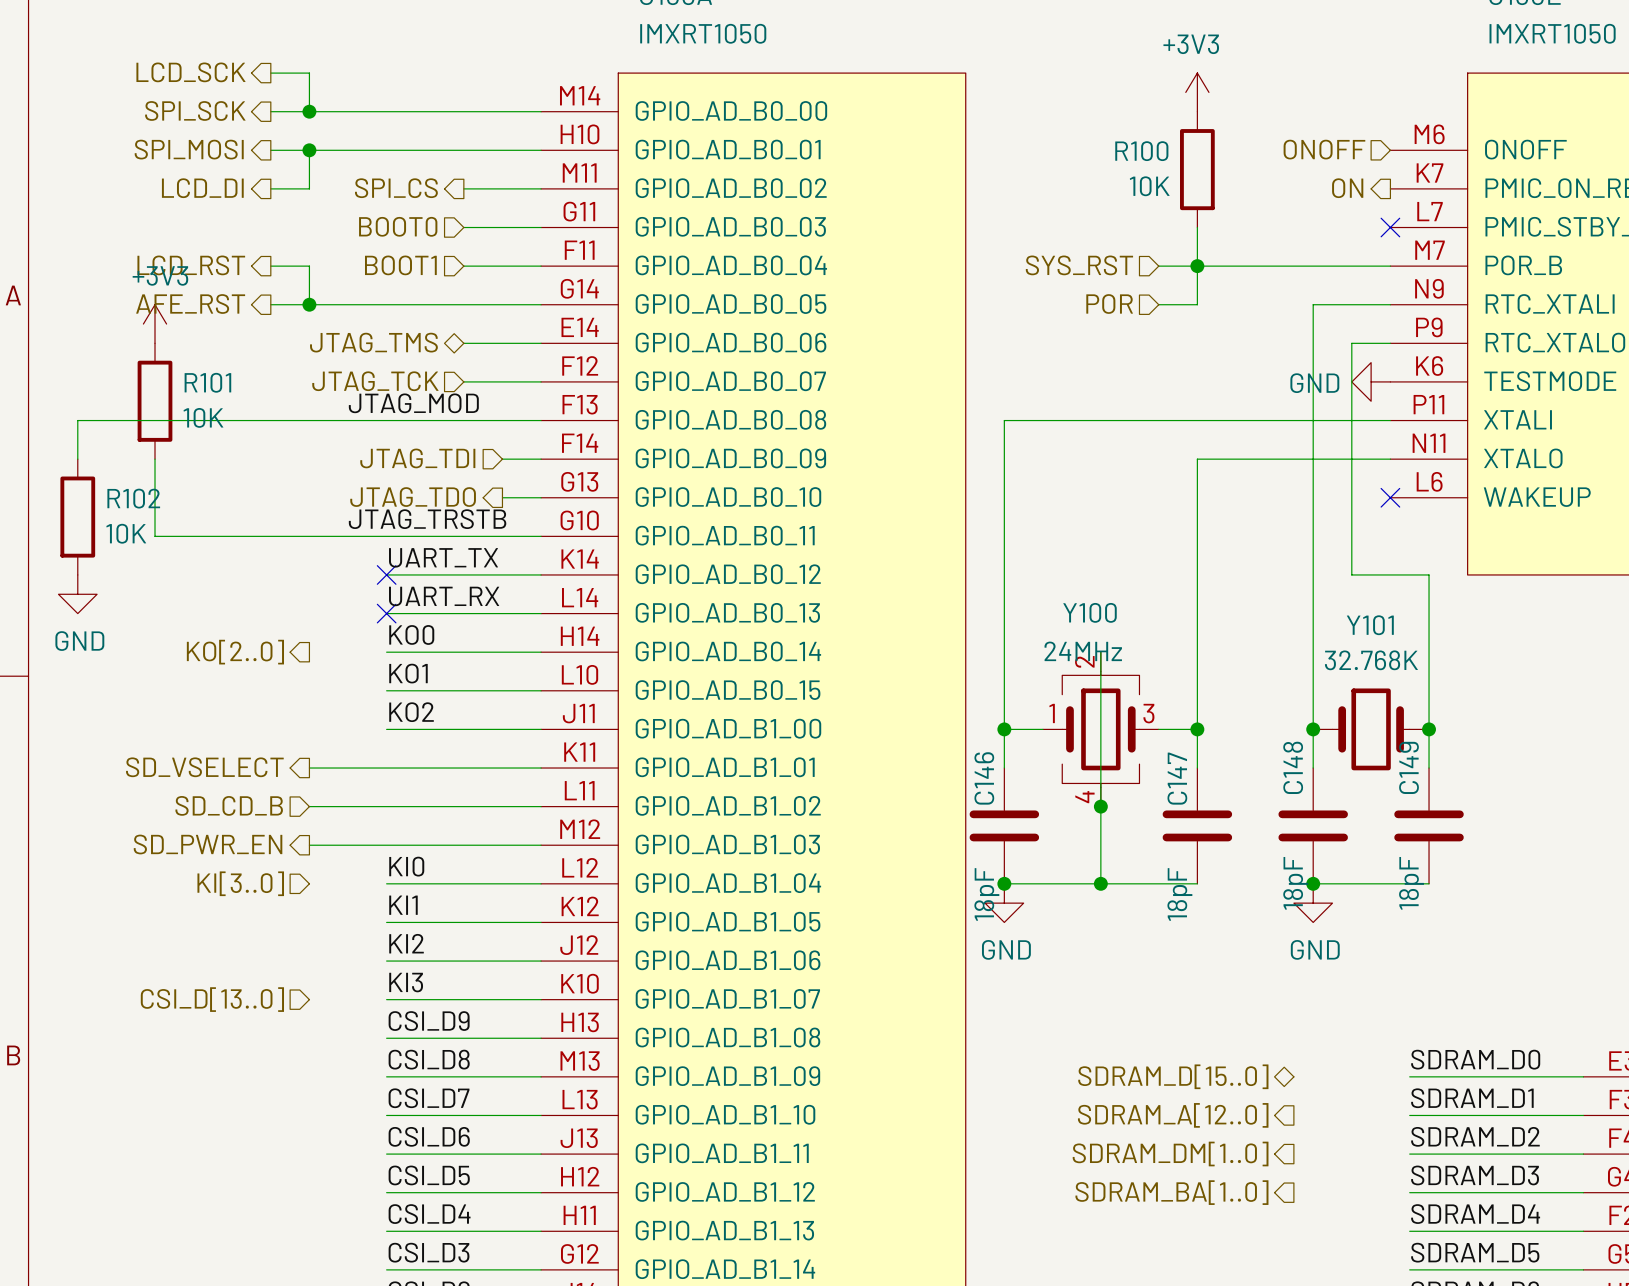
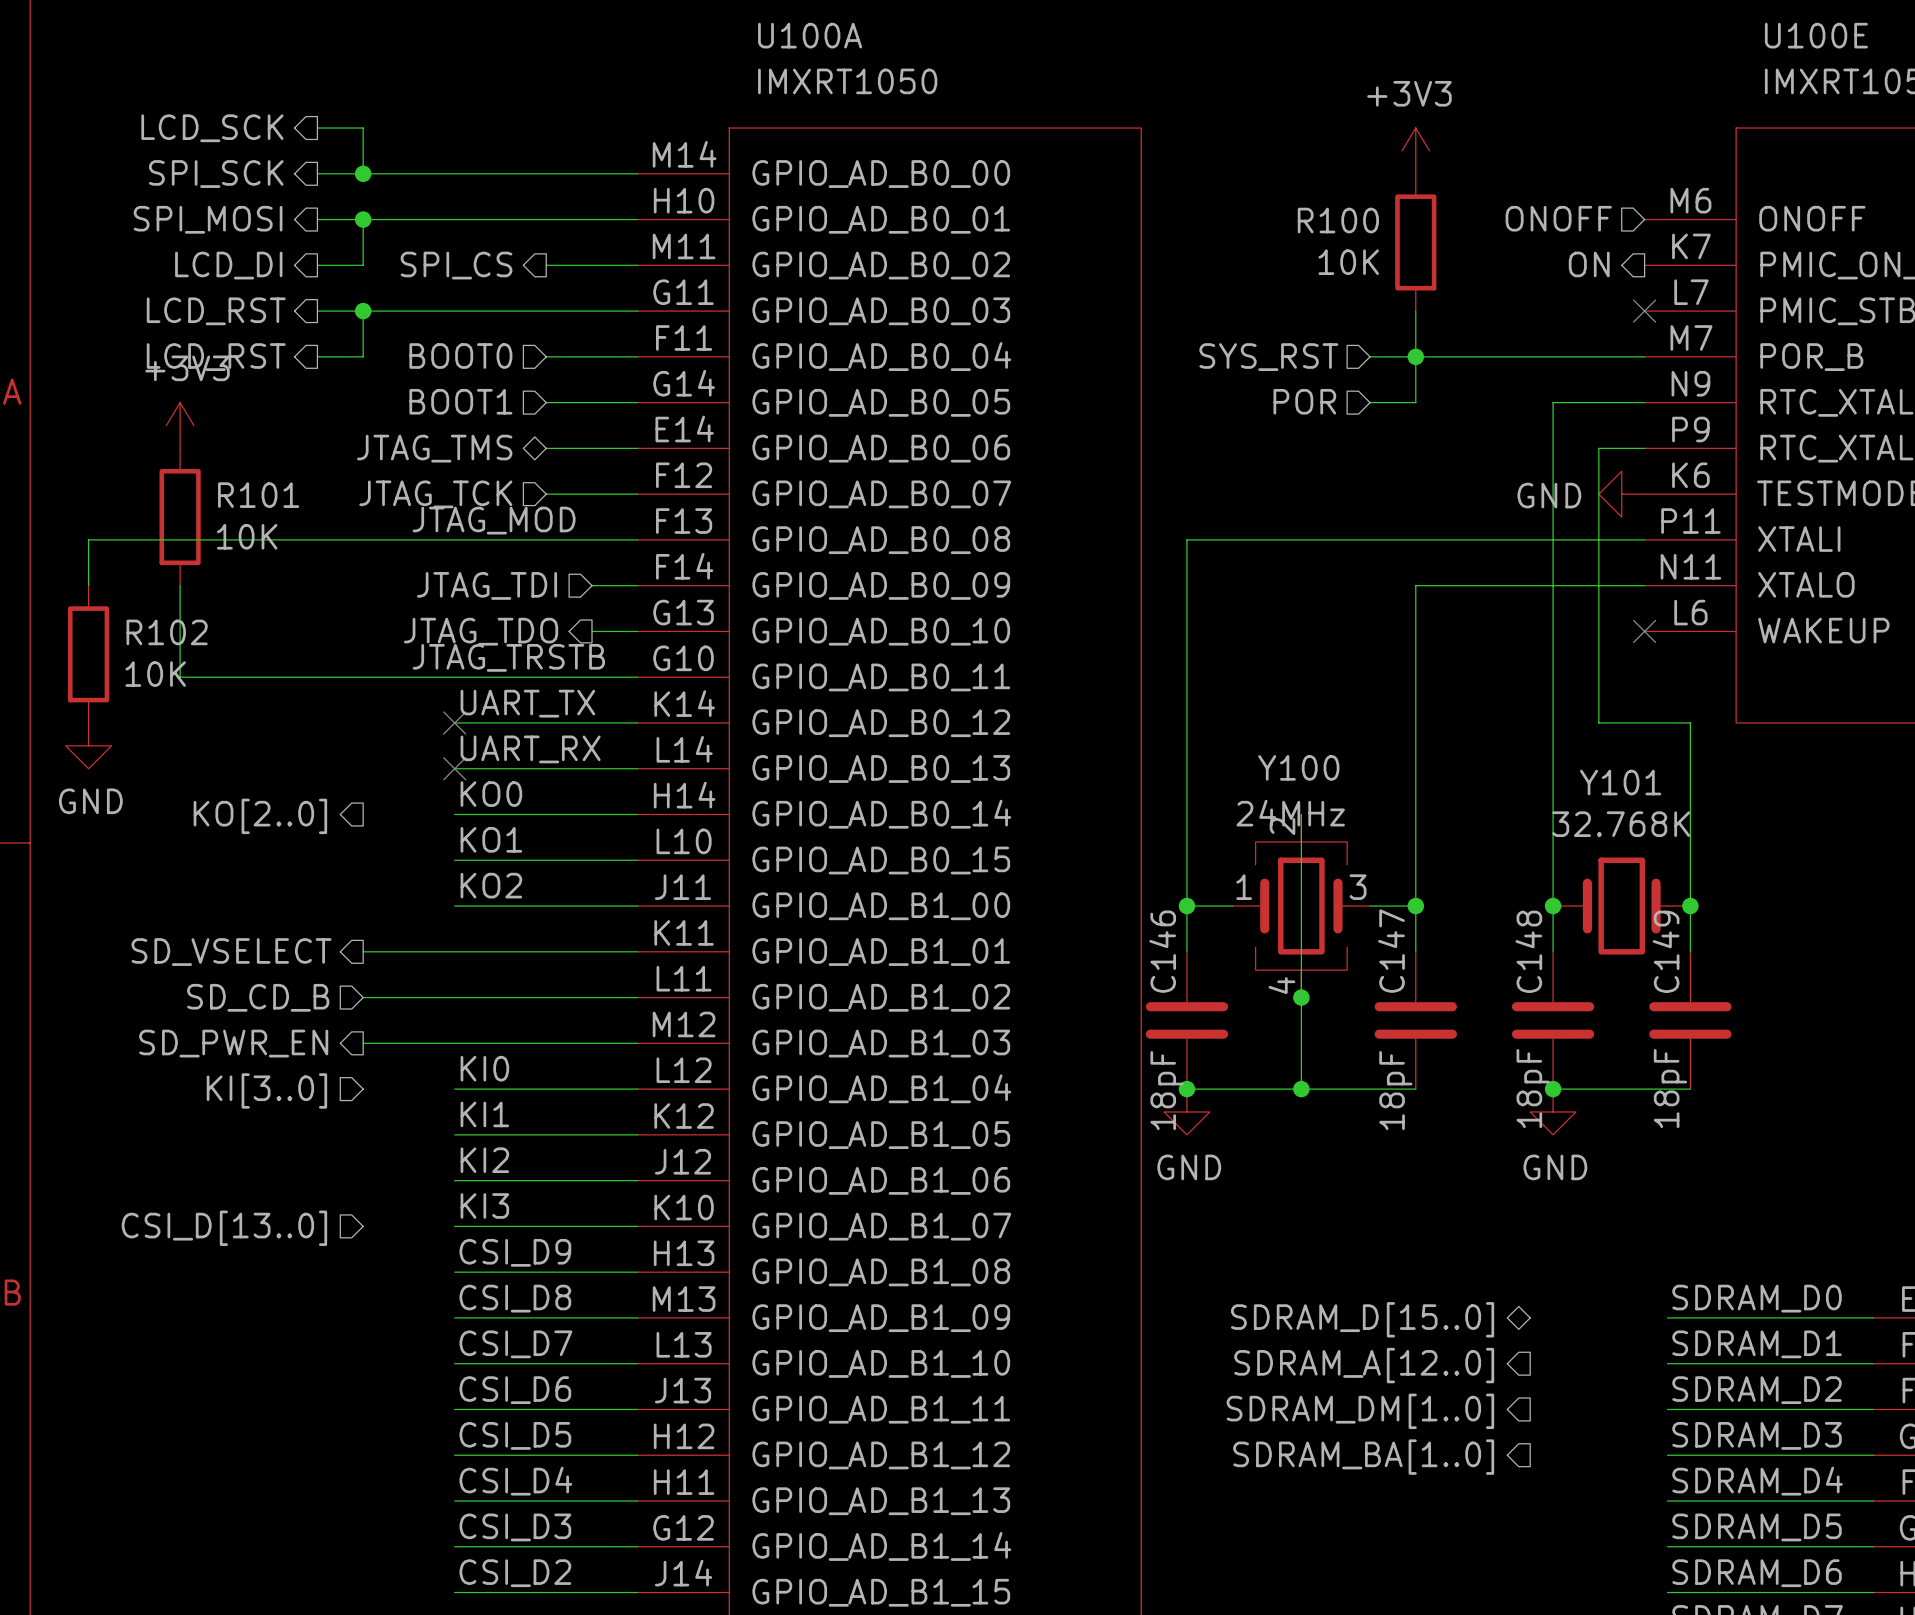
hierarchical label: none -> LCD_RST (216, 311)
hierarchical label: BOOT0 (398, 226) -> none
hierarchical label: BOOT1 (400, 265) -> BOOT0 (460, 356)
wire: (309, 266) (309, 304) -> (363, 356) (363, 311)
hierarchical label: AFE_RST (190, 304) -> none
wire: (270, 304) (463, 304) -> (317, 311) (546, 311)
junction position: (309, 304) -> (363, 311)
hierarchical label: none -> BOOT1 (460, 401)

